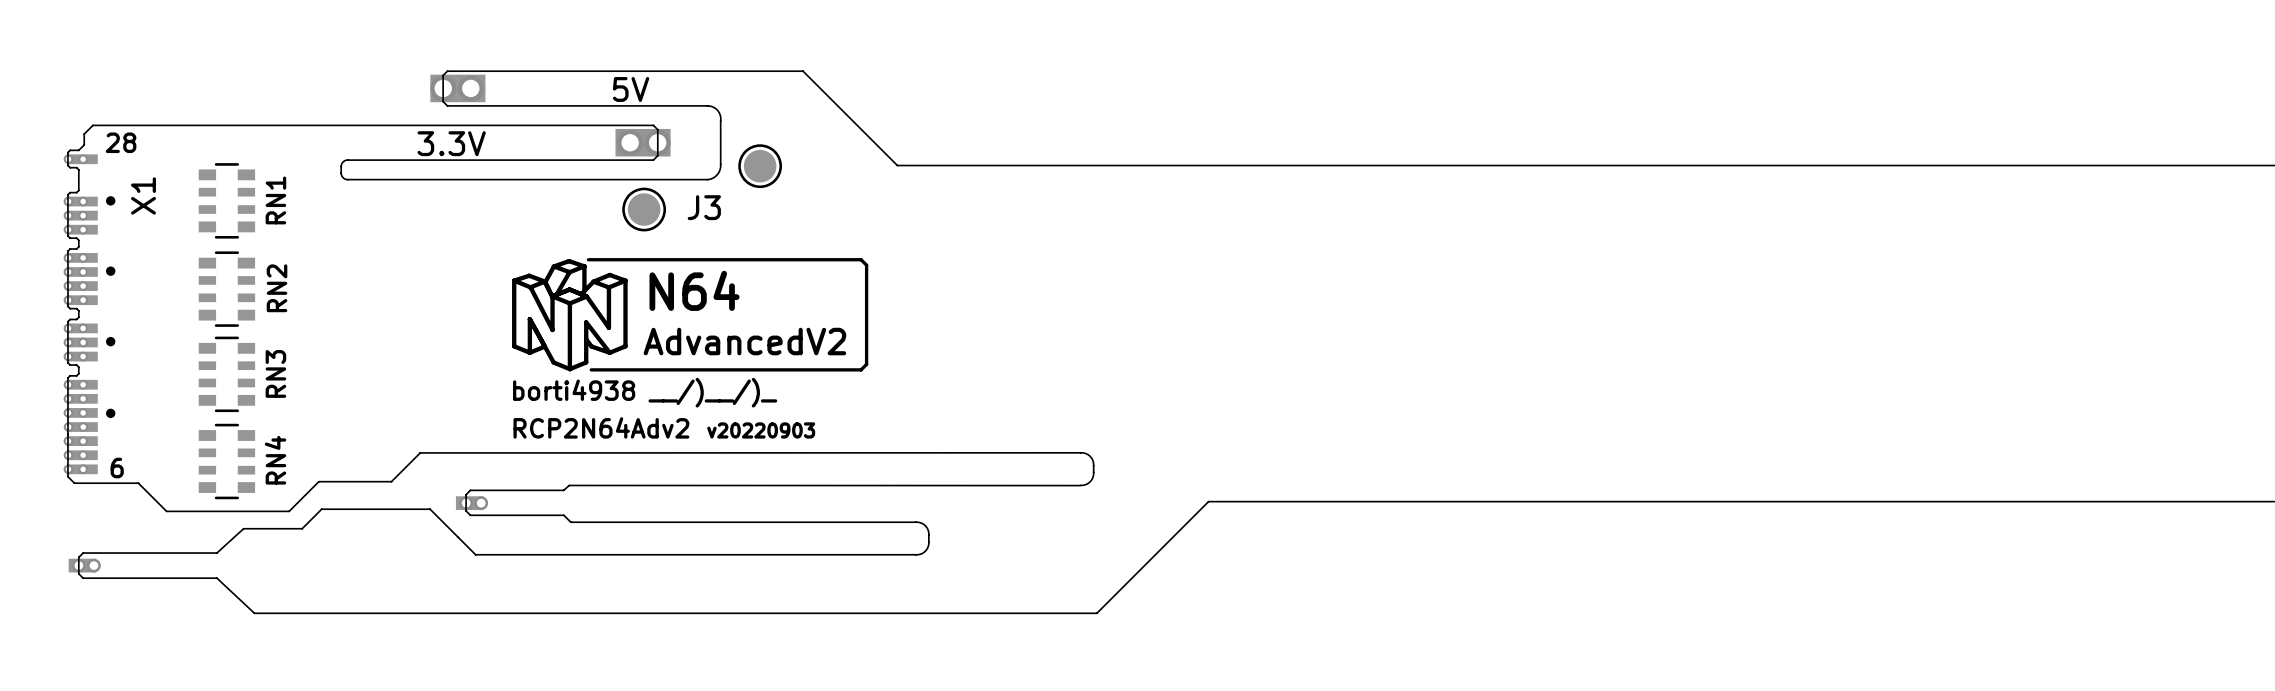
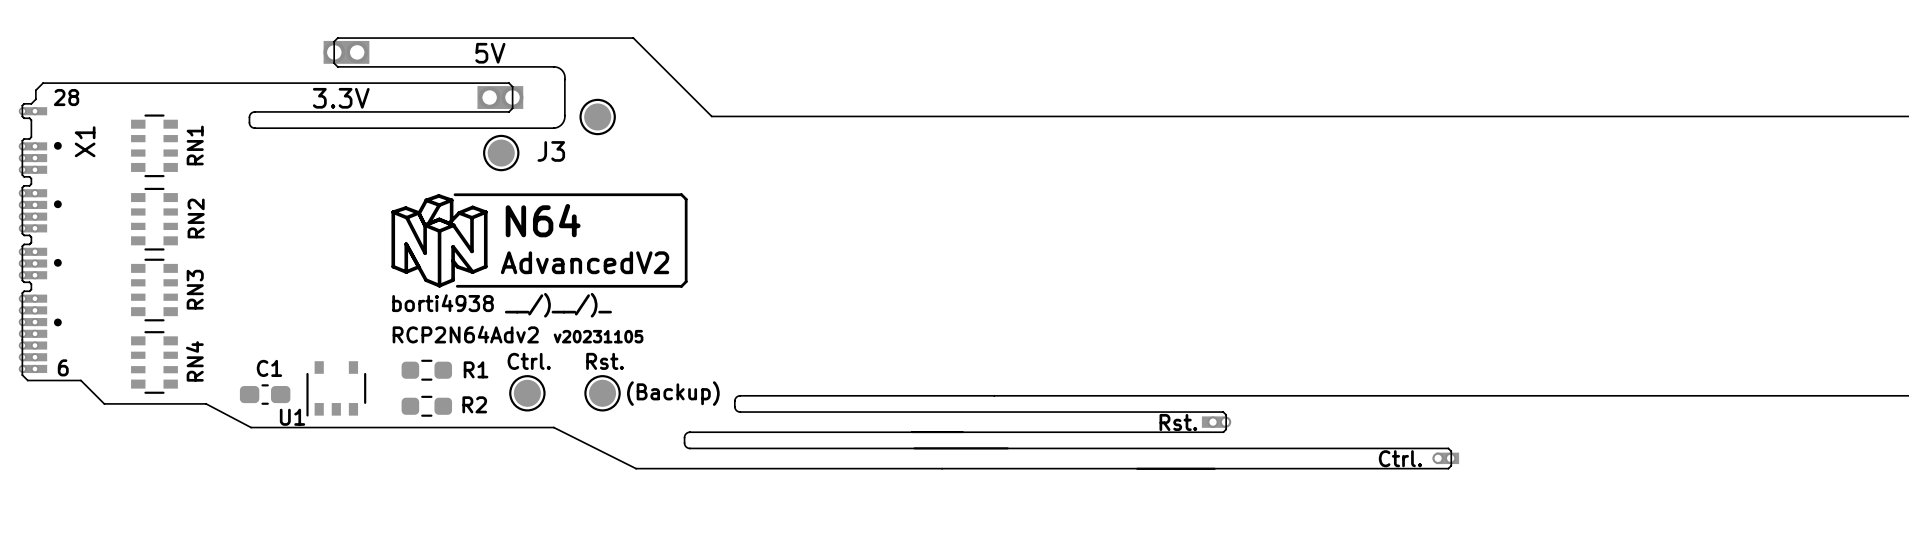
text: v20220903 (761, 430) -> v20231105 (598, 336)
text: none -> Ctrl. (529, 361)
text: none -> Rst. (605, 361)
R1: none -> (426, 370)
board edge: (1080, 485) (569, 485) (563, 490) (470, 490) (466, 494) (466, 510) (470, 515) (563, 515) (570, 522) (918, 522) (927, 529) (928, 543) (925, 551) (917, 554) (475, 554) (430, 509) (321, 509) (302, 528) (243, 528) (216, 553) (83, 553) (78, 557) (78, 573) (83, 578) (216, 578) (254, 613) (1096, 613) (1208, 501) -> (740, 412) (736, 410) (734, 406) (735, 399) (739, 395) (970, 395)
board edge: (1080, 485) (1089, 482) (1093, 473) (1091, 458) (1082, 452) (420, 452) (391, 481) (318, 481) (289, 511) -> (740, 412) (1223, 412) (1226, 414) (1226, 429) (1223, 432) (689, 432) (684, 435) (685, 445) (689, 448) (1448, 448) (1451, 451) (1451, 465) (1448, 468) (636, 468) (553, 427) (251, 427) (206, 403)
U1: none -> (336, 388)
part: none -> (527, 393)
part: none -> (602, 393)
text: none -> (Backup) (673, 393)
C1: none -> (265, 394)
part: (472, 503) -> none
R2: none -> (426, 406)
text: none -> Rst. (1178, 422)
part: none -> (1216, 422)
part: (84, 565) -> none
part: none -> (1445, 458)
text: none -> Ctrl. (1400, 458)

